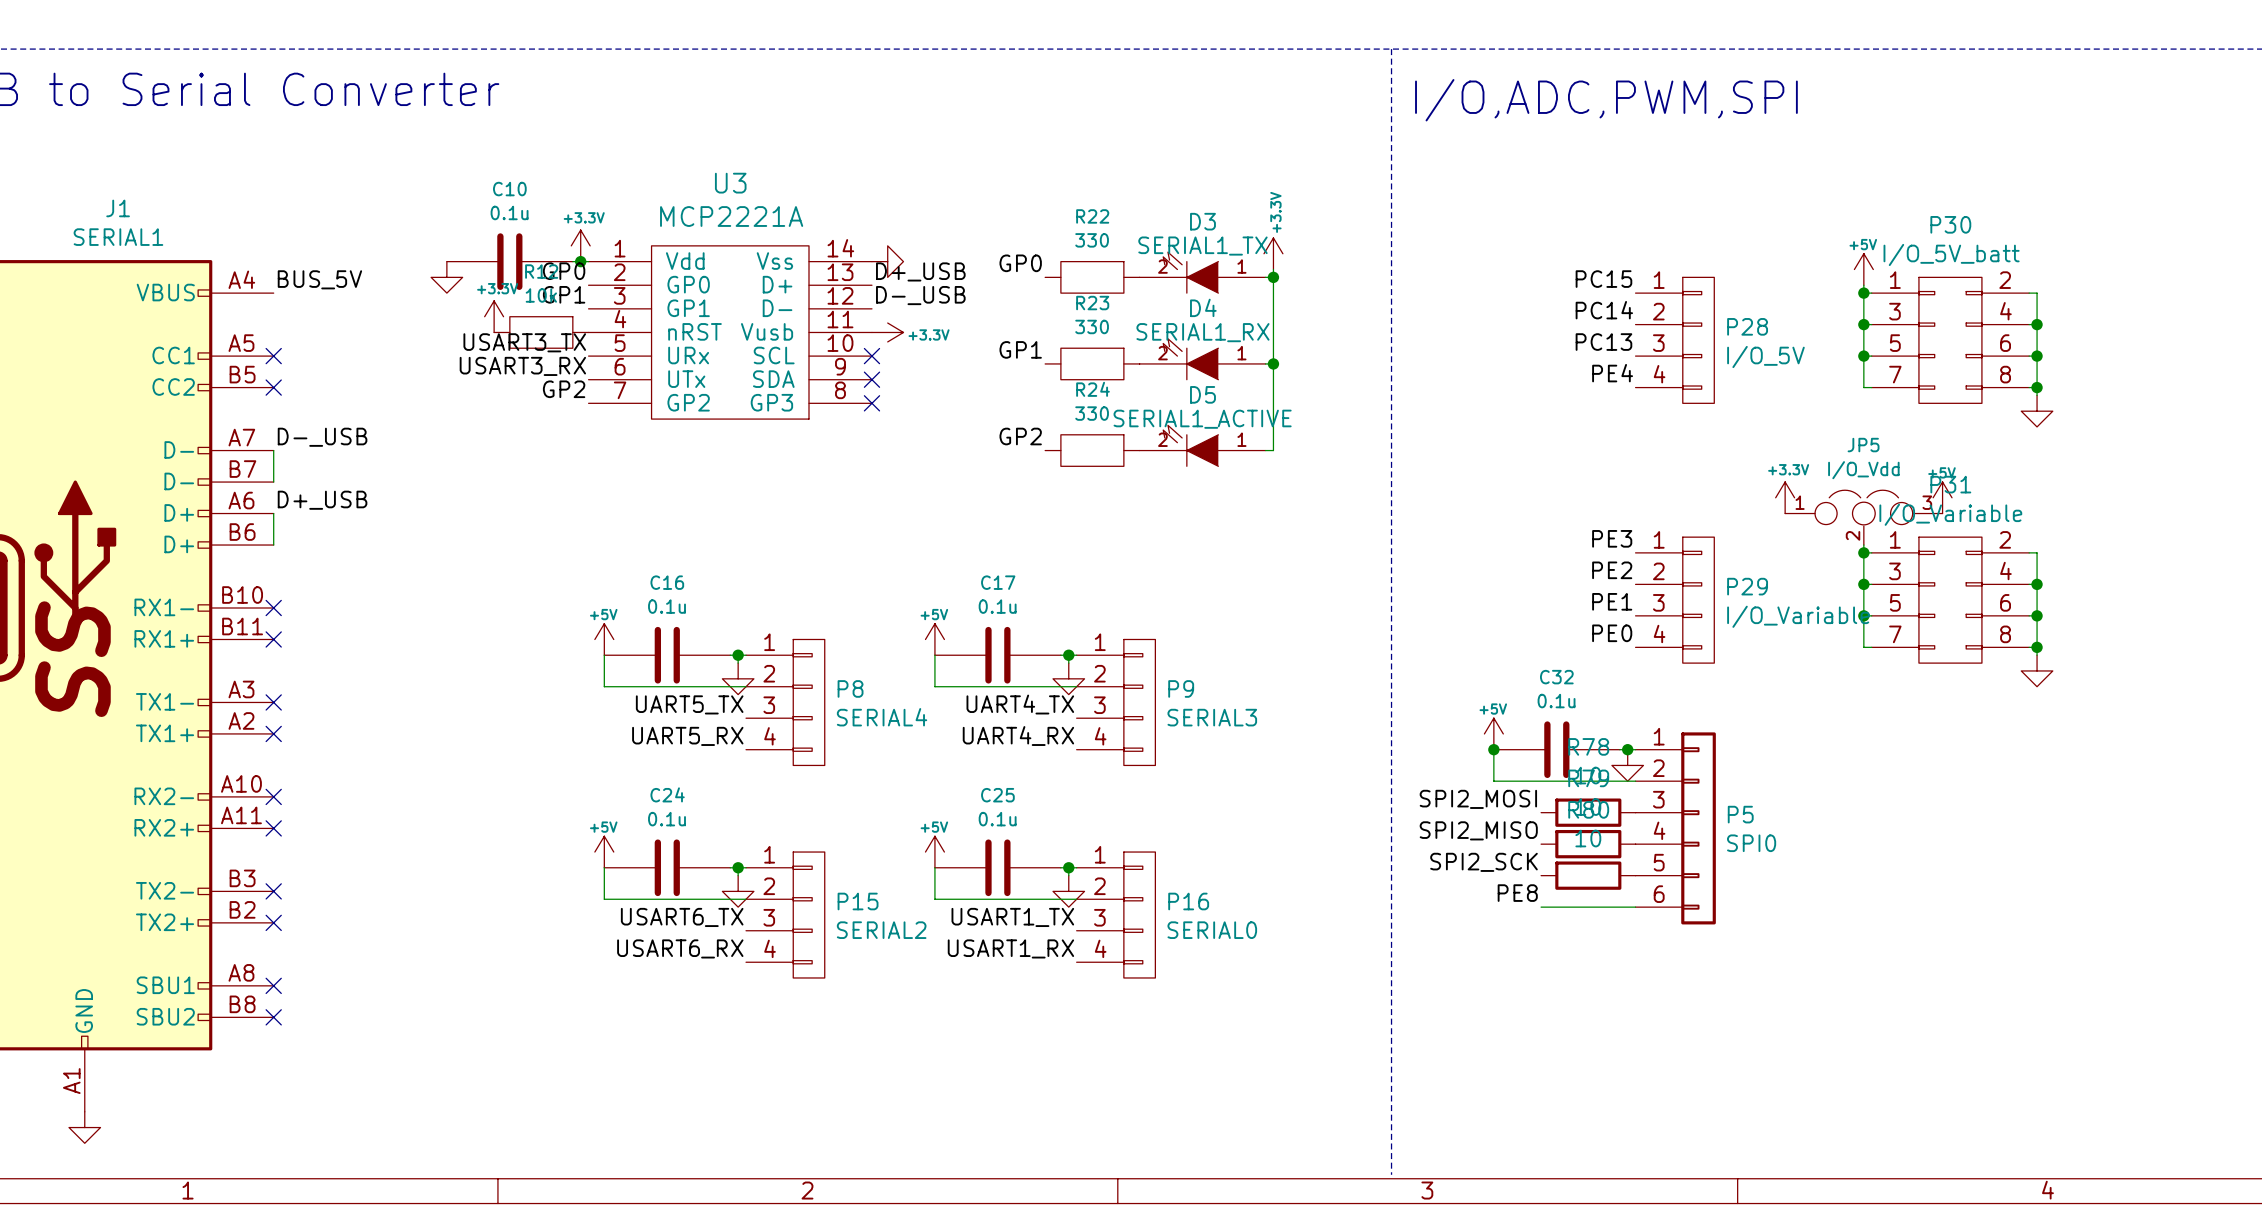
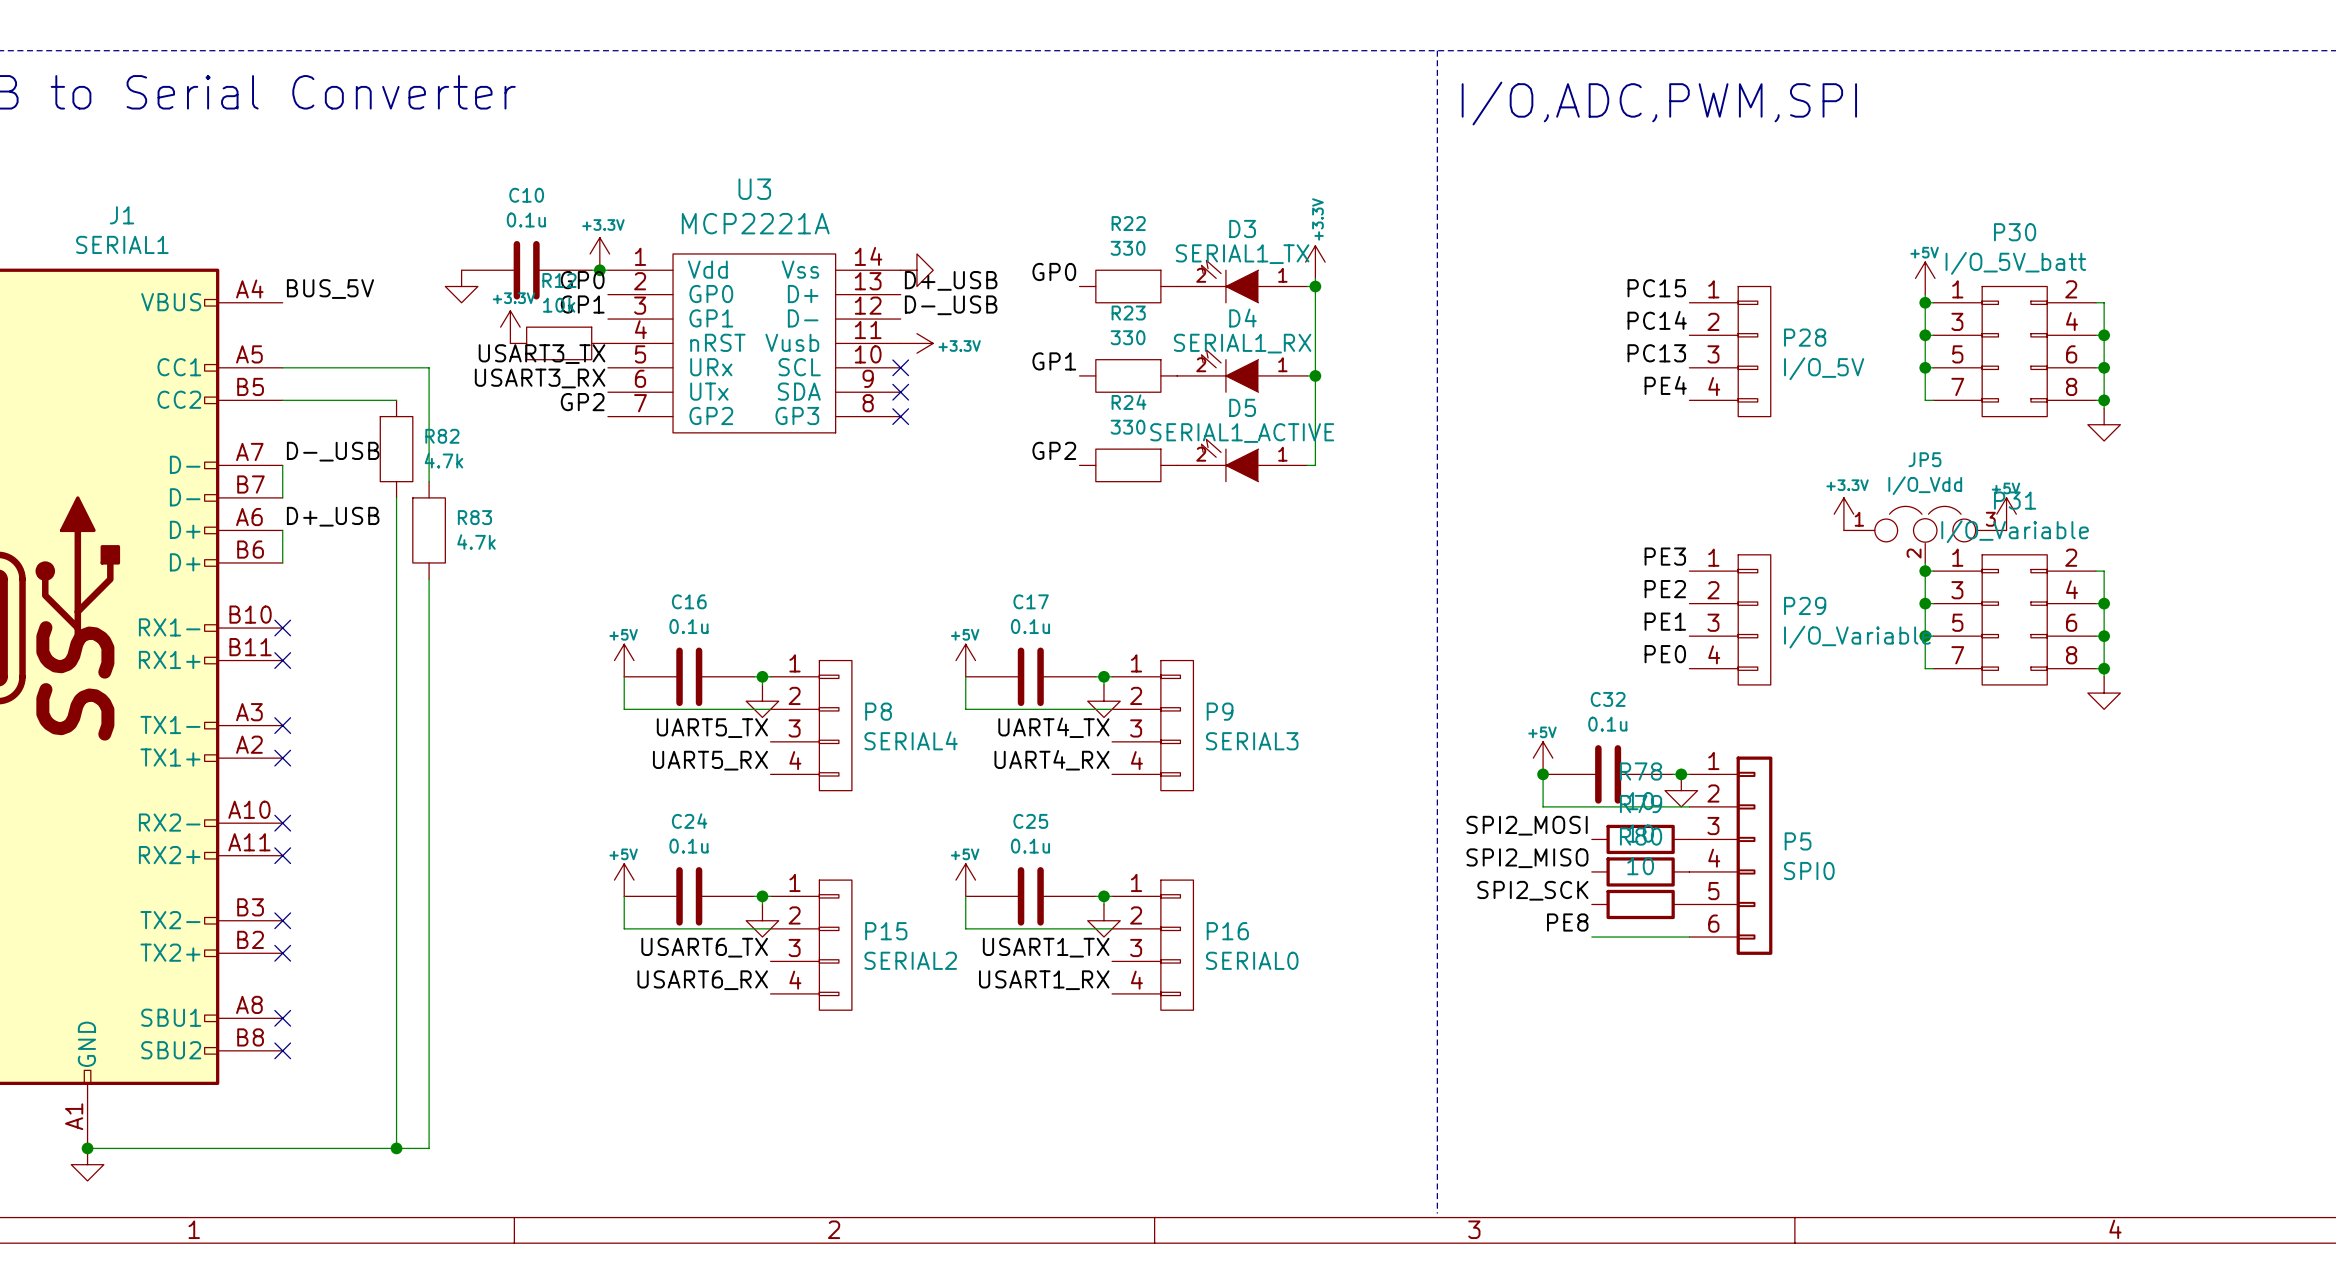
wire: none -> (282, 367) (429, 367) (429, 481)
no-connect mark: (273, 356) -> none
wire: none -> (282, 400) (396, 400)
no-connect mark: (273, 387) -> none
R82: none -> 4.7k (396, 449)
wire: none -> (396, 497) (396, 1148)
R83: none -> 4.7k (429, 530)
wire: none -> (429, 579) (429, 1148) (87, 1148)
junction: none -> (87, 1148)
junction: none -> (396, 1148)

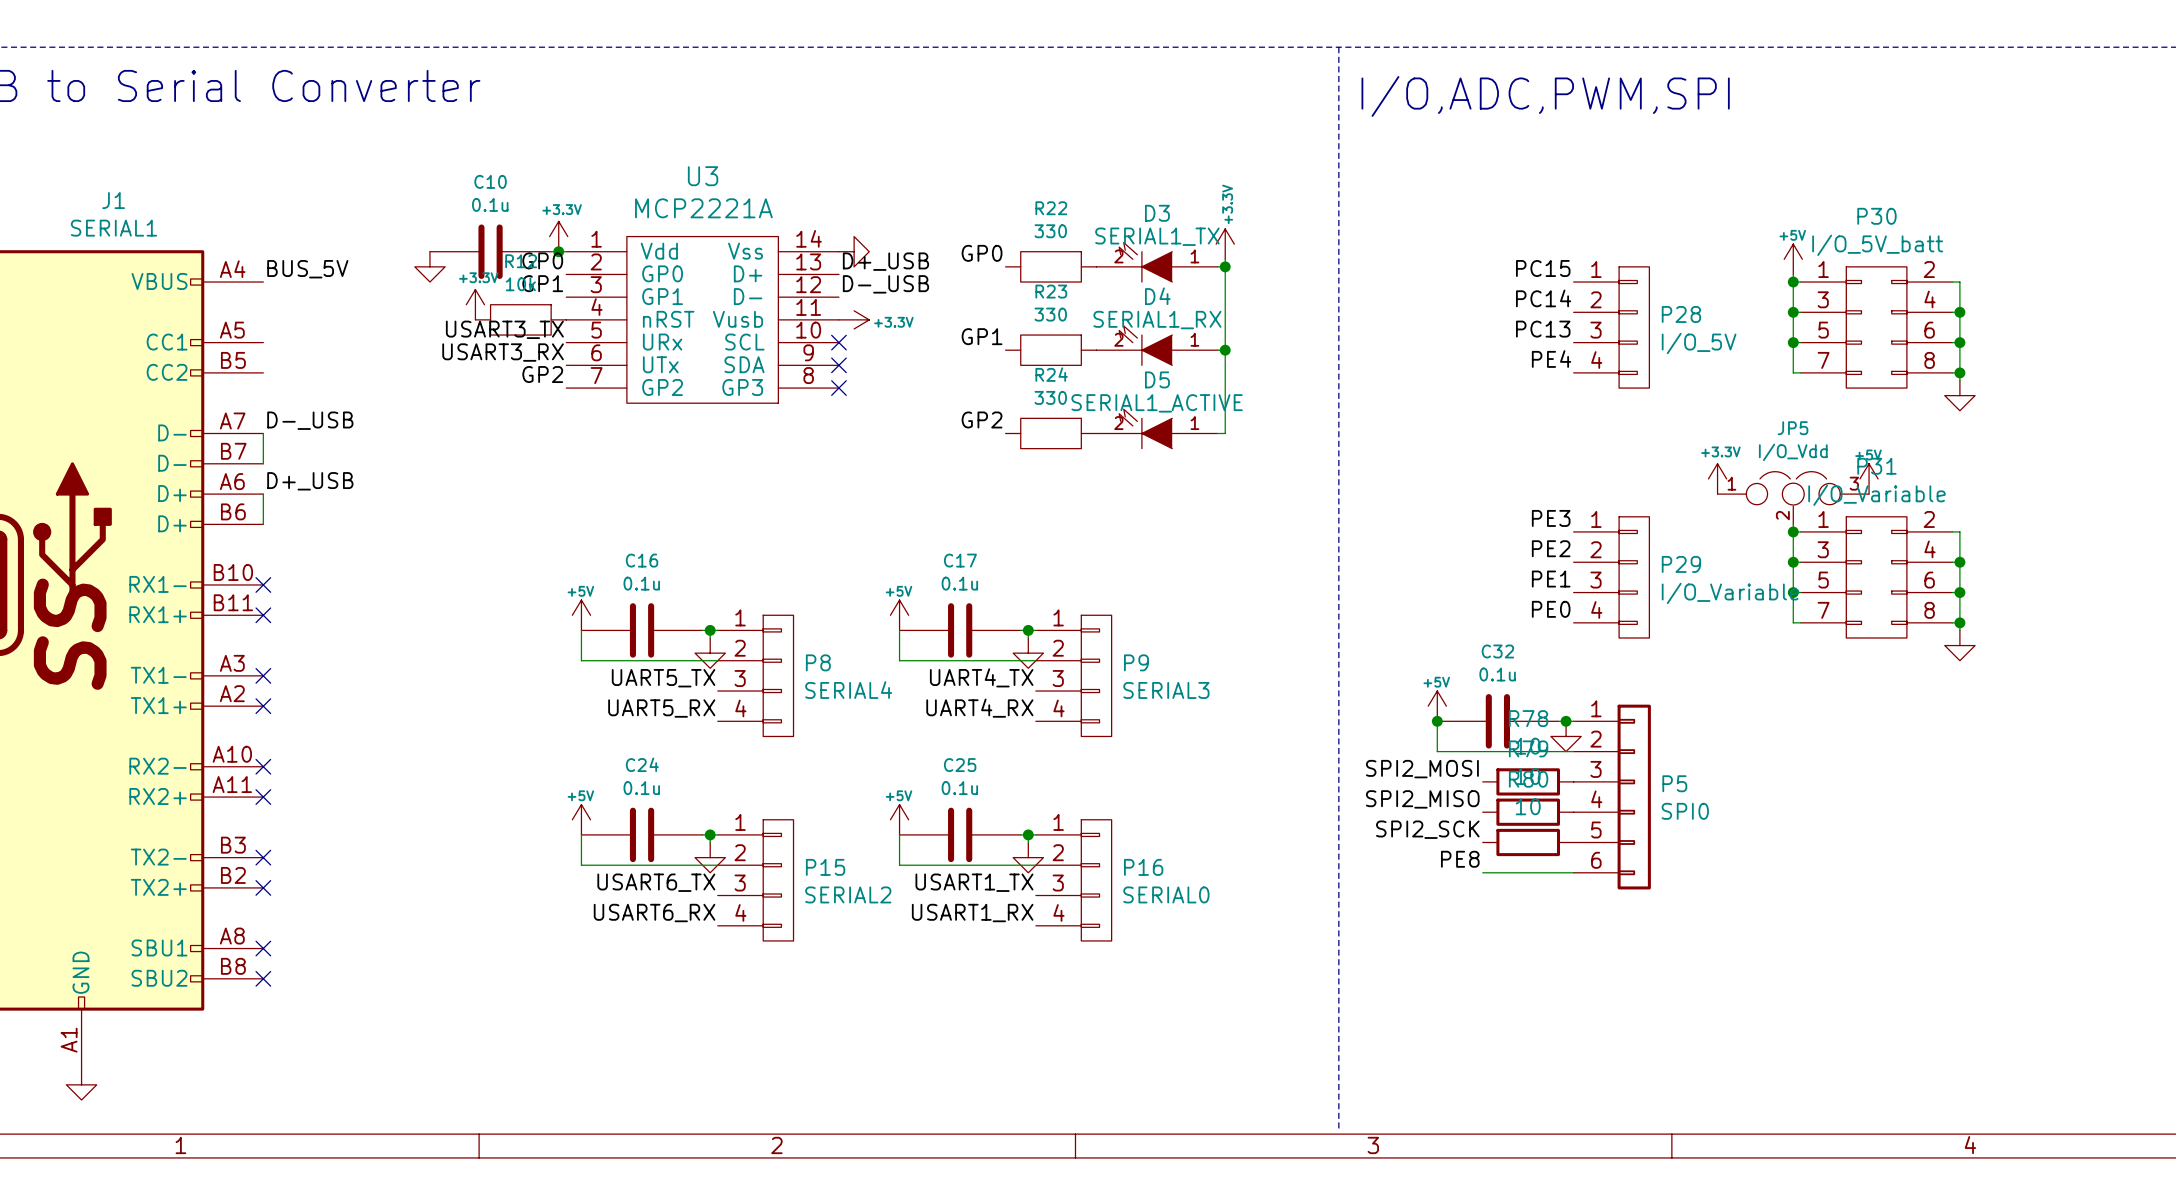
wire: (282, 367) (429, 367) (429, 481) -> none
wire: (282, 400) (396, 400) -> none
R82: 4.7k (396, 449) -> none
wire: (396, 497) (396, 1148) -> none
R83: 4.7k (429, 530) -> none
wire: (429, 579) (429, 1148) (87, 1148) -> none
junction: (87, 1148) -> none
junction: (396, 1148) -> none

